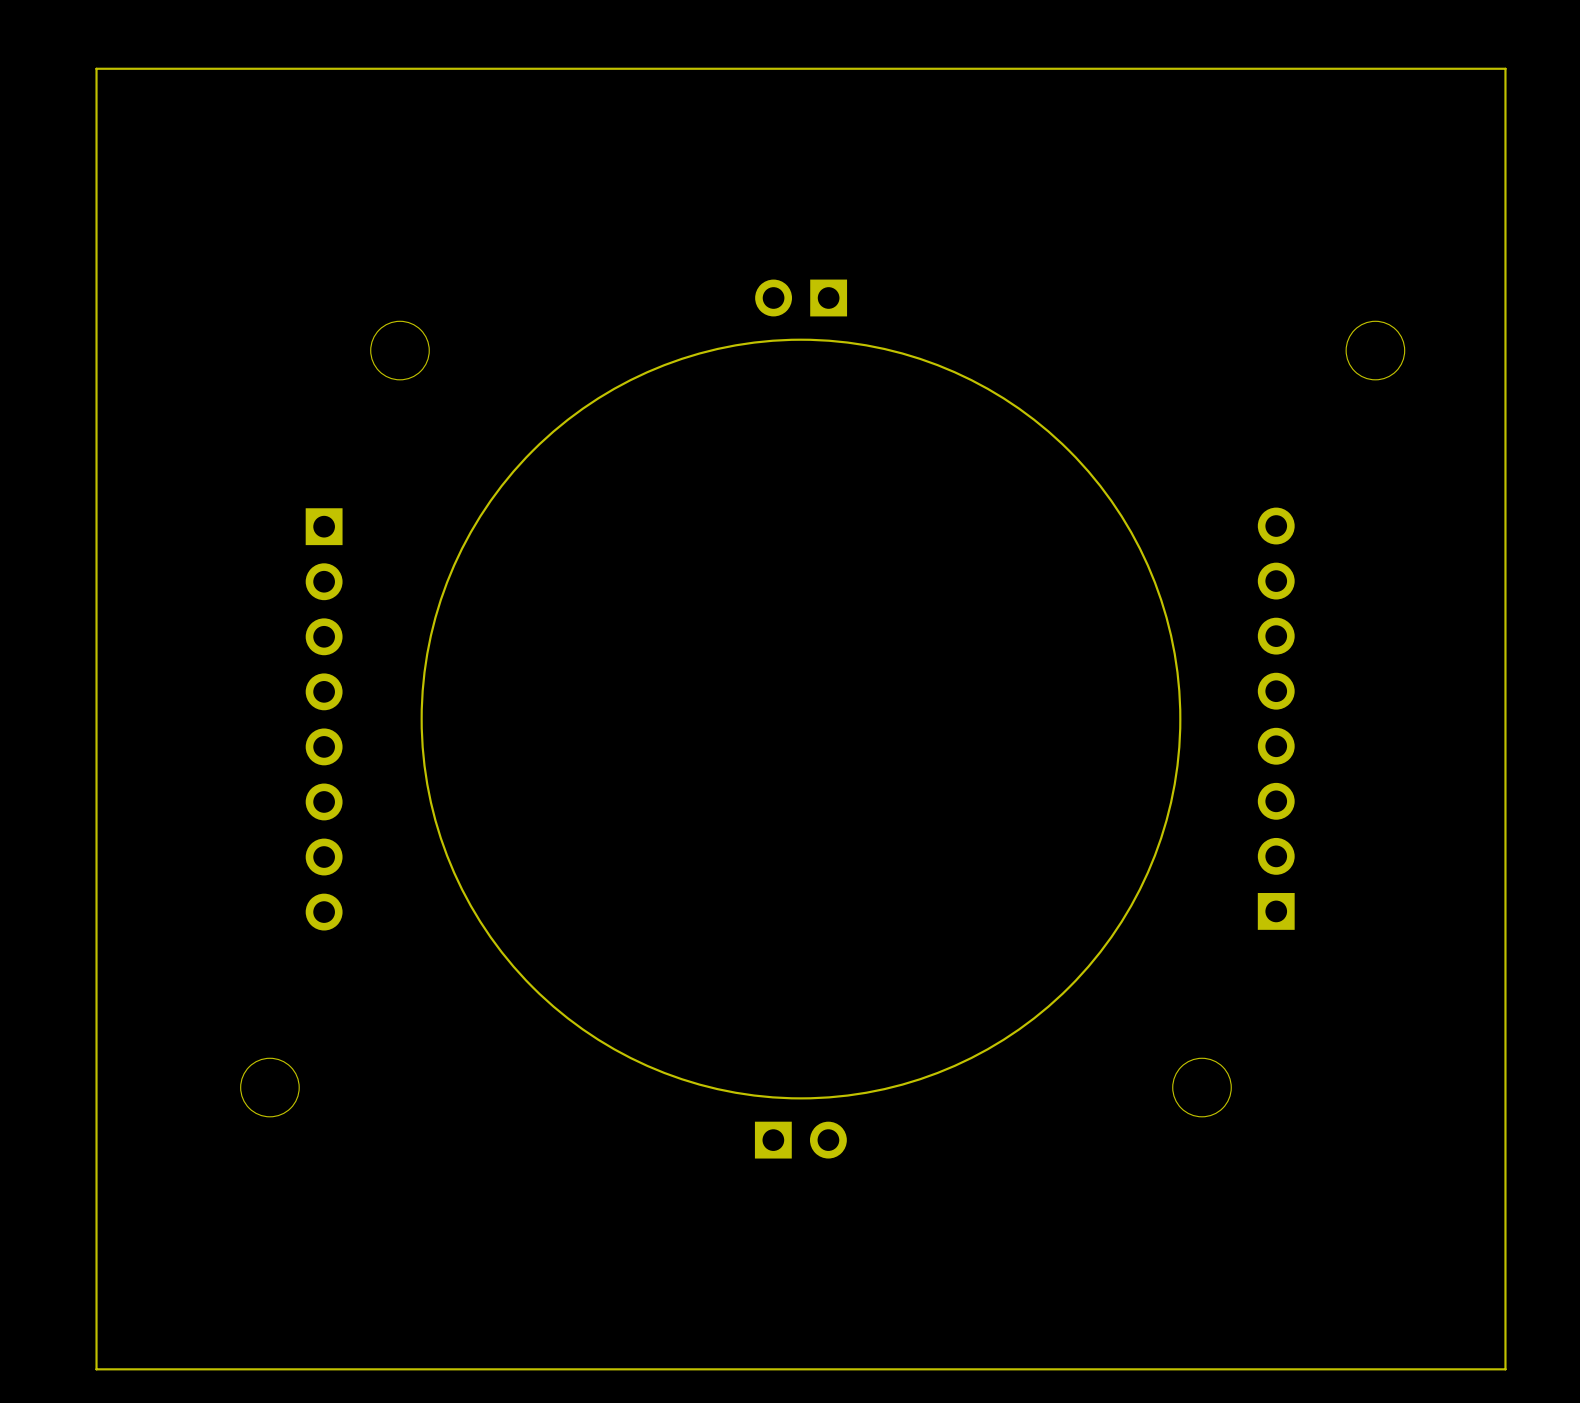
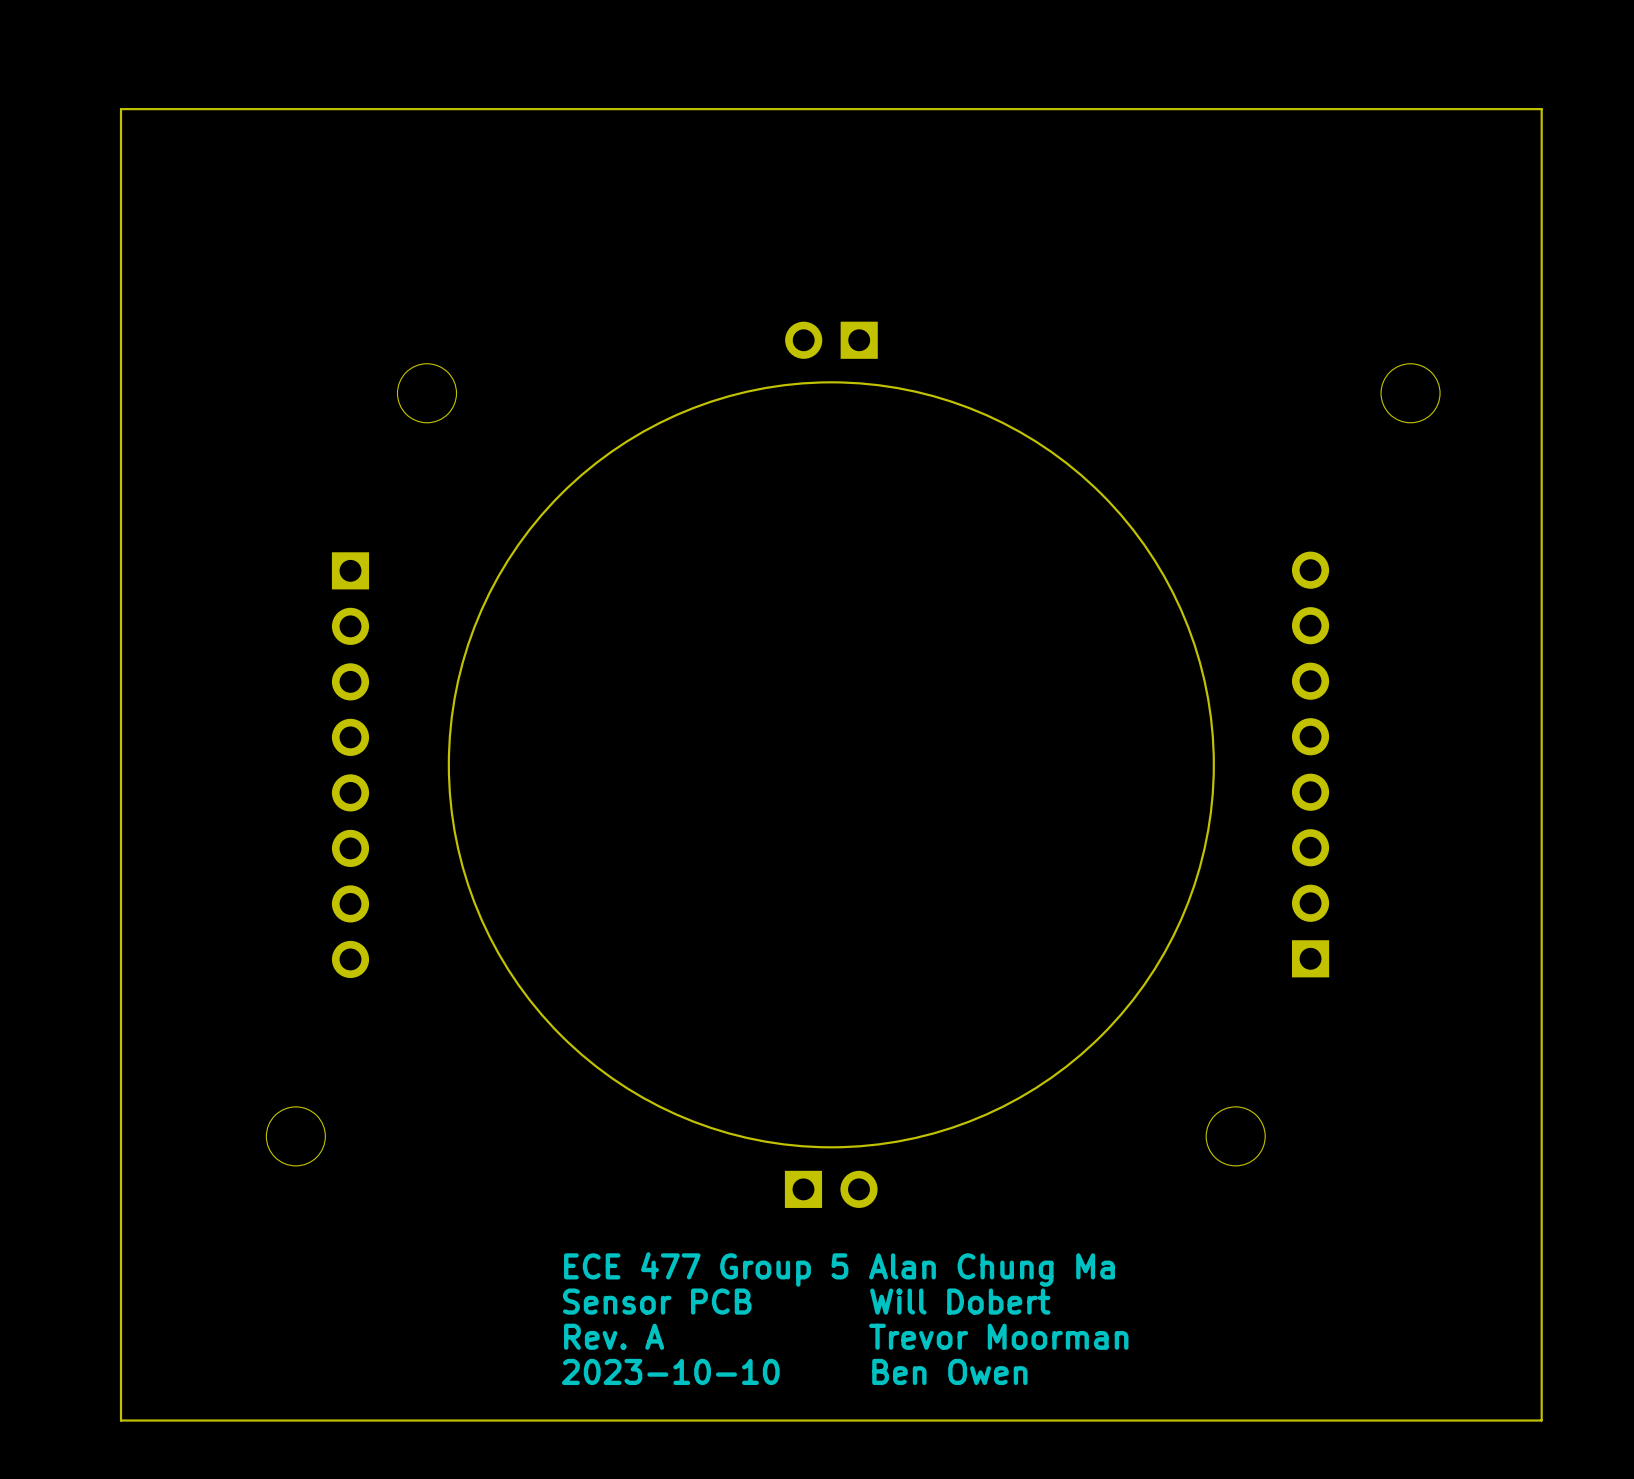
text: none -> ECE 477 Group 5 (706, 1269)
text: none -> Alan Chung Ma (992, 1270)
text: none -> Sensor PCB (657, 1301)
text: none -> Will Dobert (960, 1301)
text: none -> Rev. A (614, 1336)
text: none -> Trevor Moorman (998, 1336)
text: none -> 2023-10-10 (670, 1371)
text: none -> Ben Owen (949, 1371)

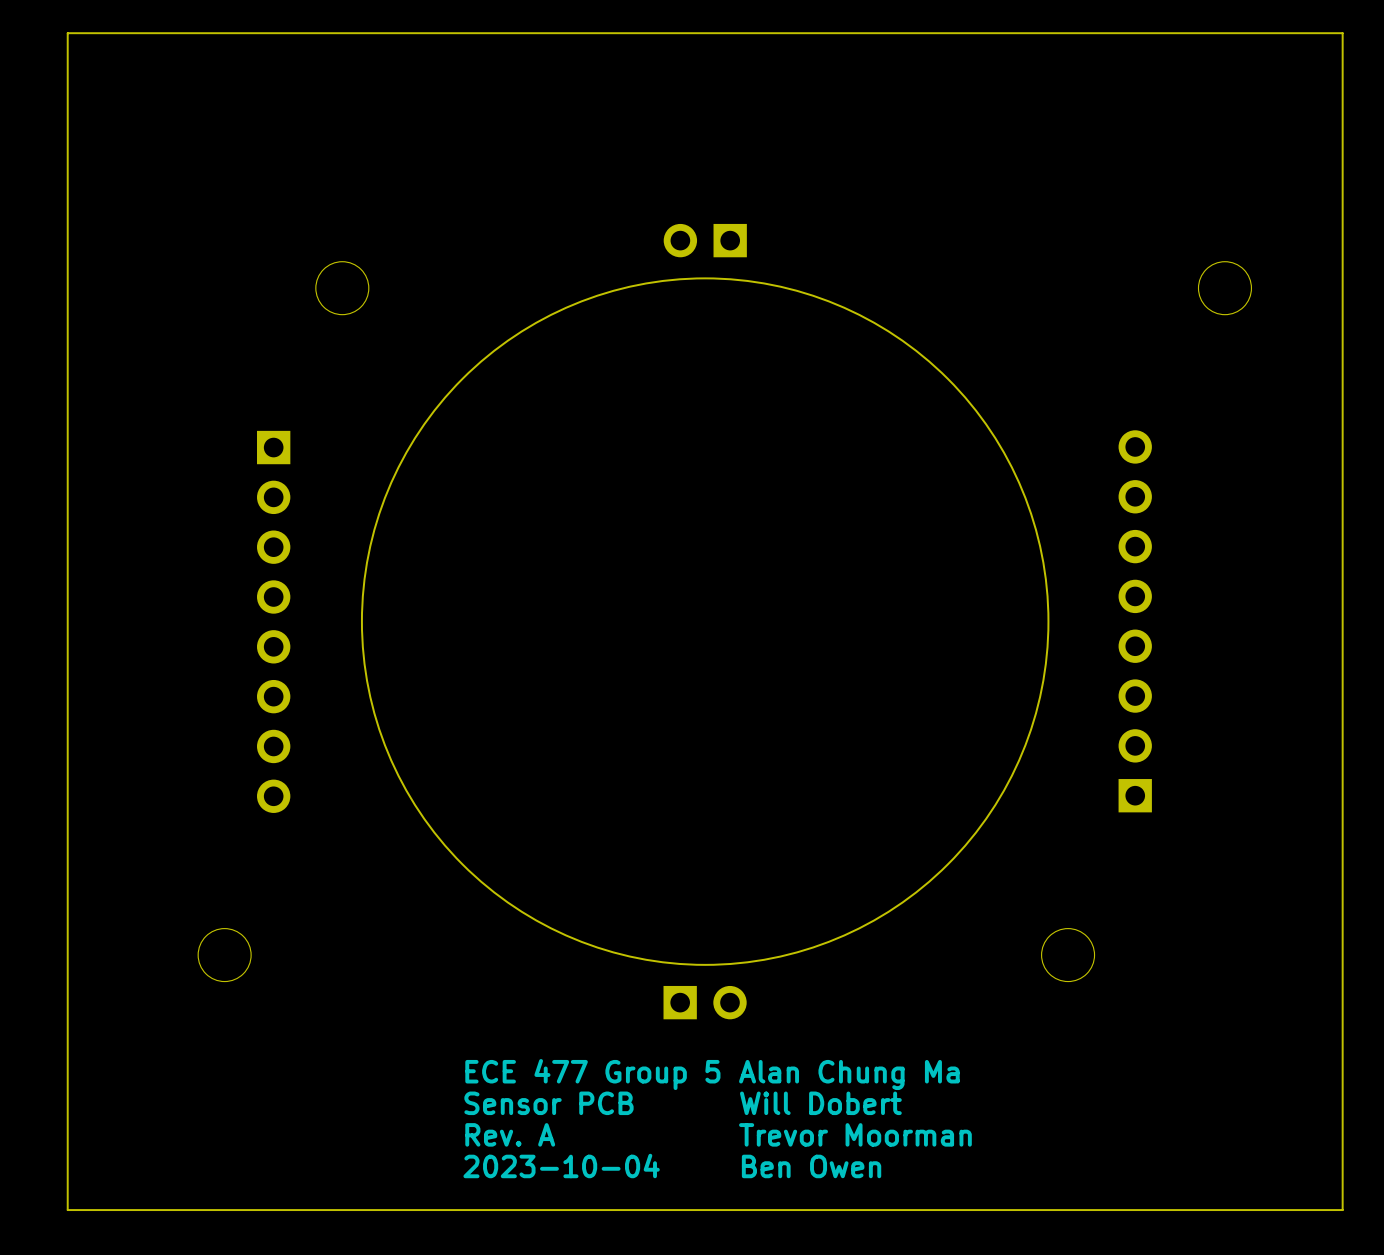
text: 2023-10-10 (670, 1371) -> 2023-10-04 (561, 1165)

